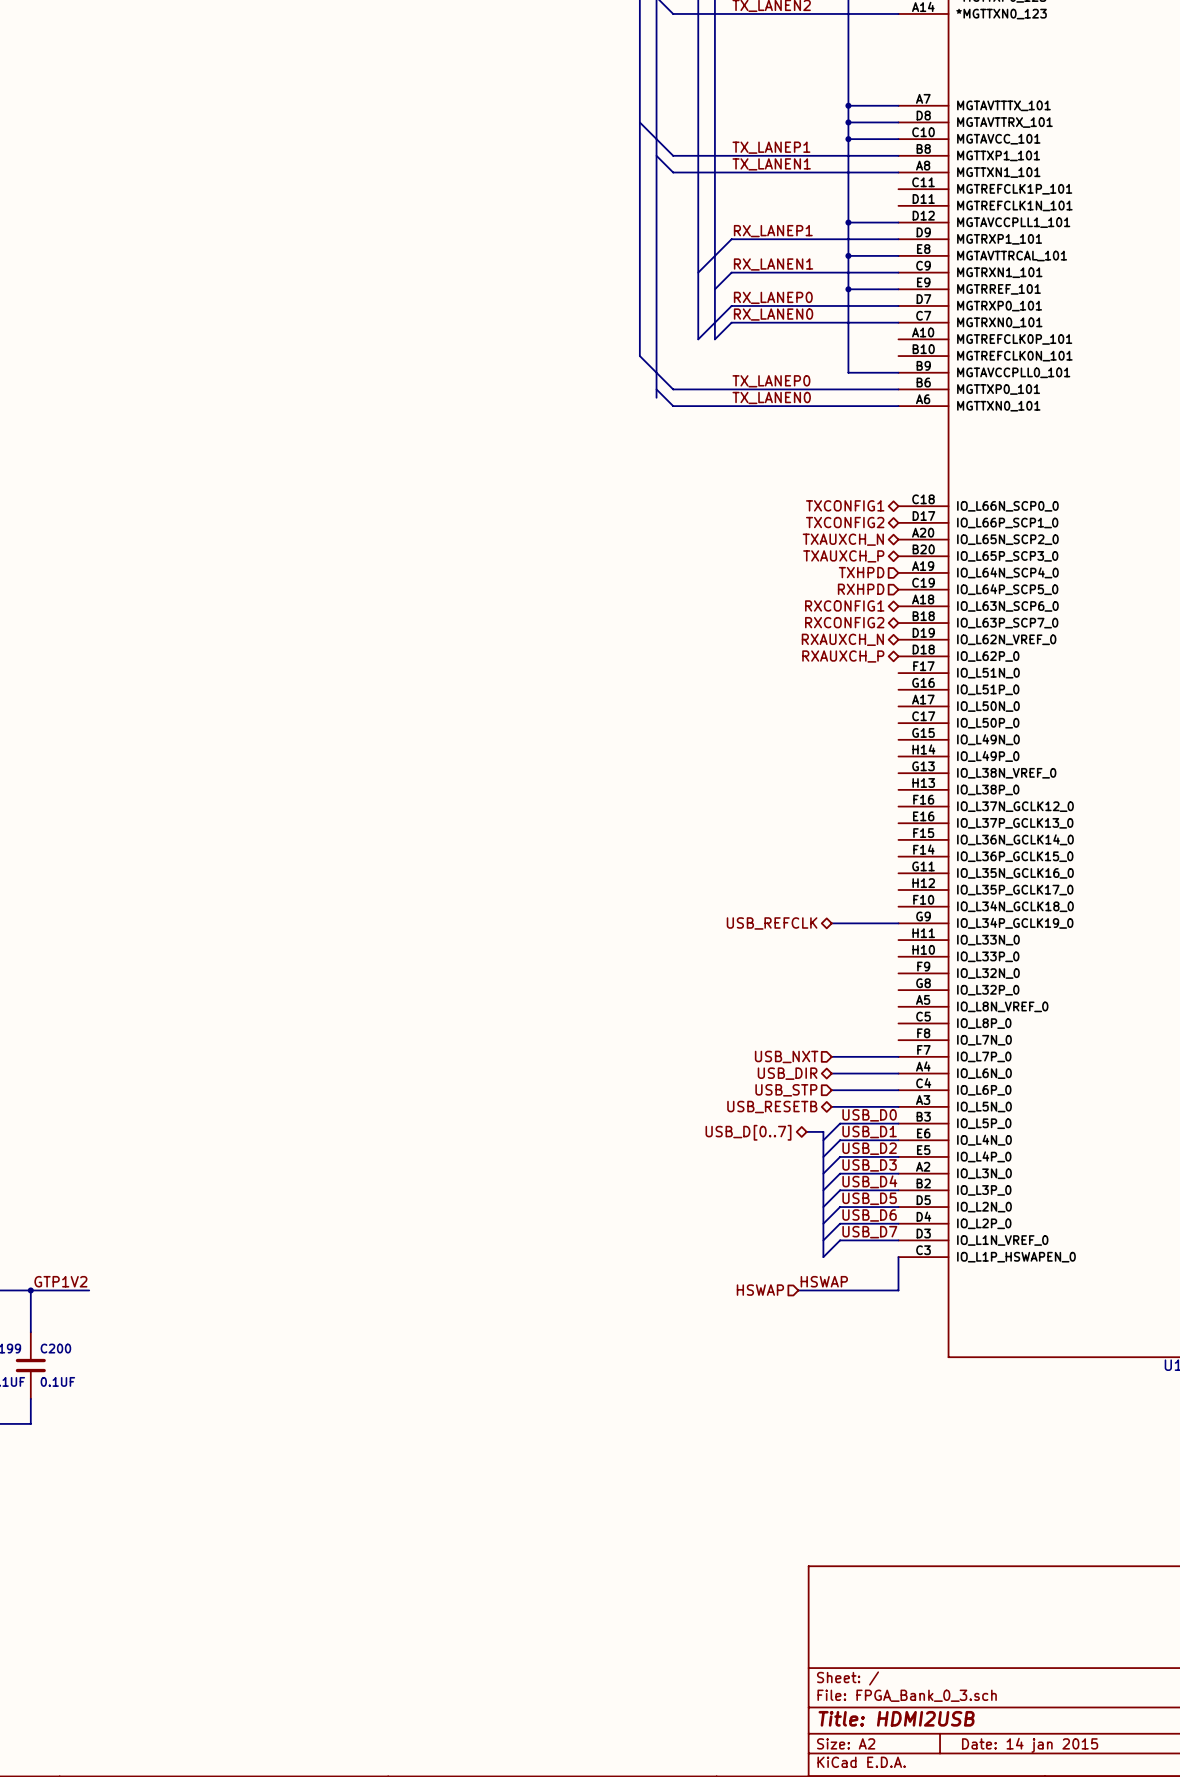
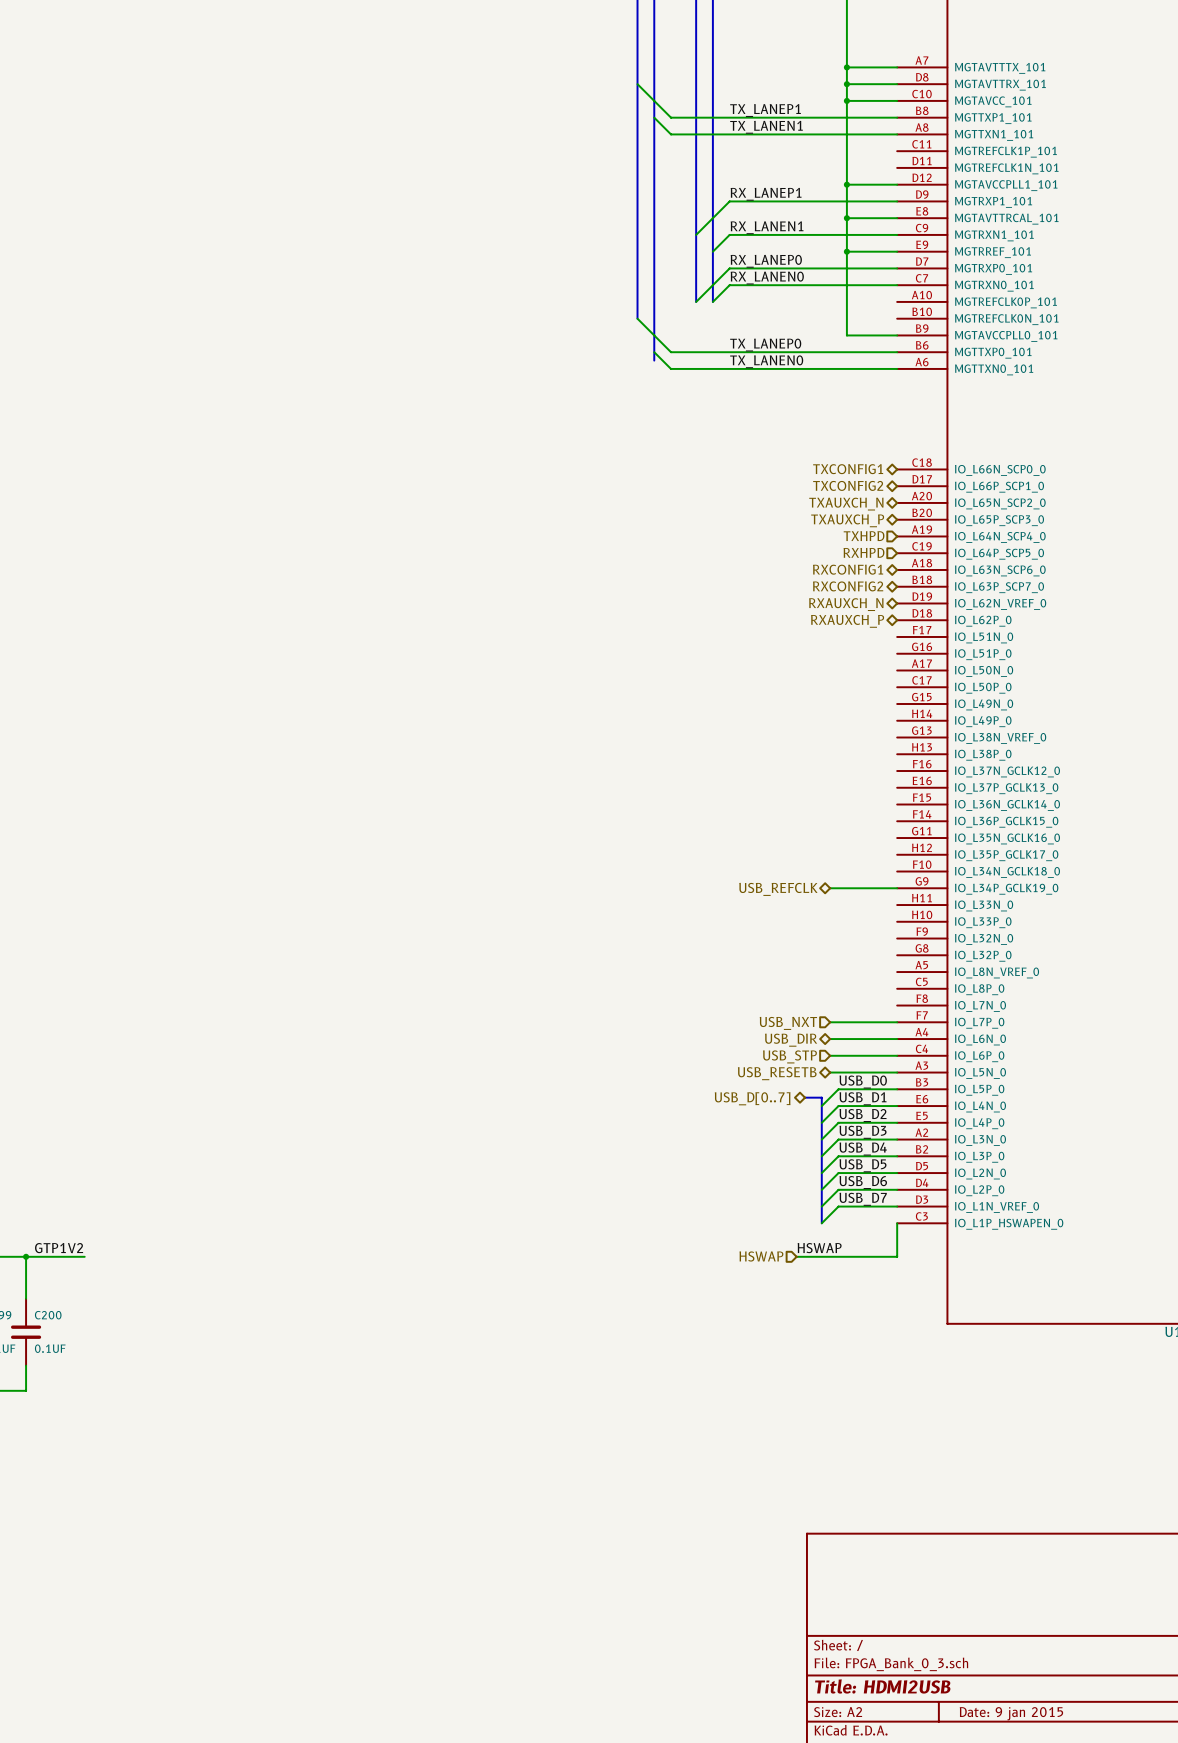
title block: Date: 14 jan 2015 (1030, 1745) -> Date: 9 jan 2015 (1011, 1713)

